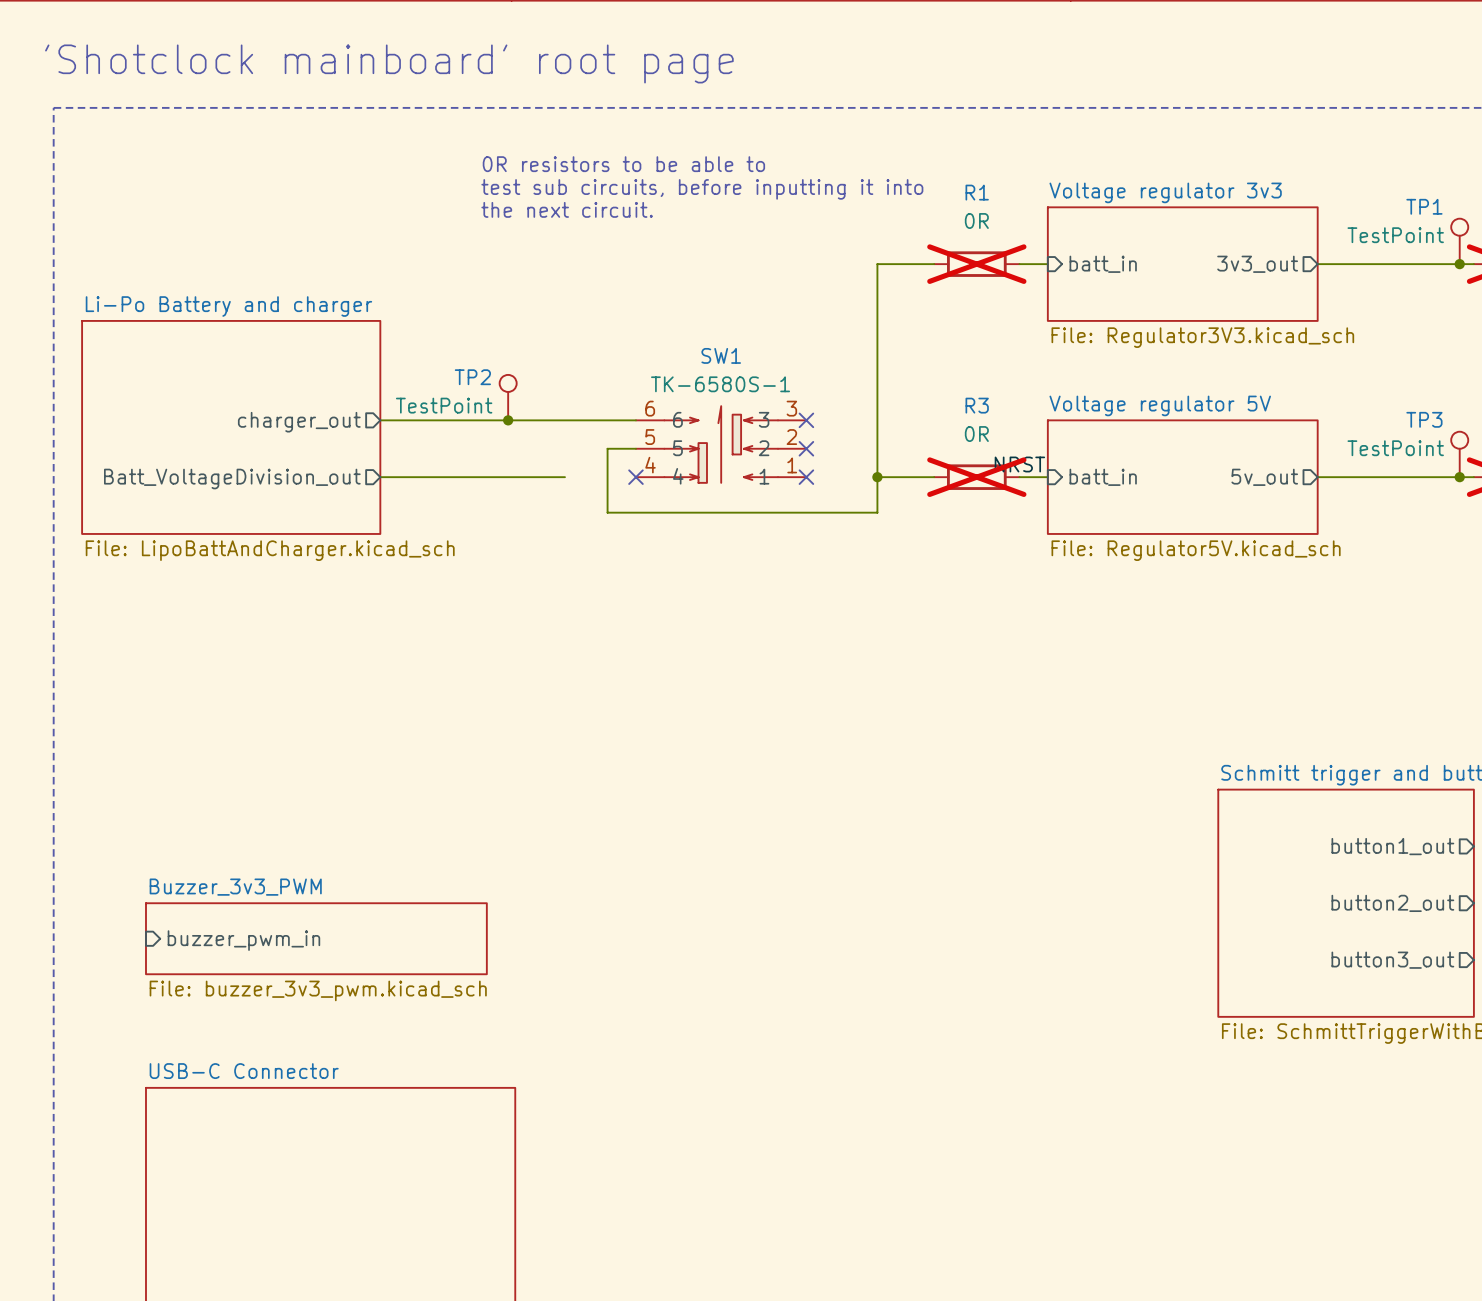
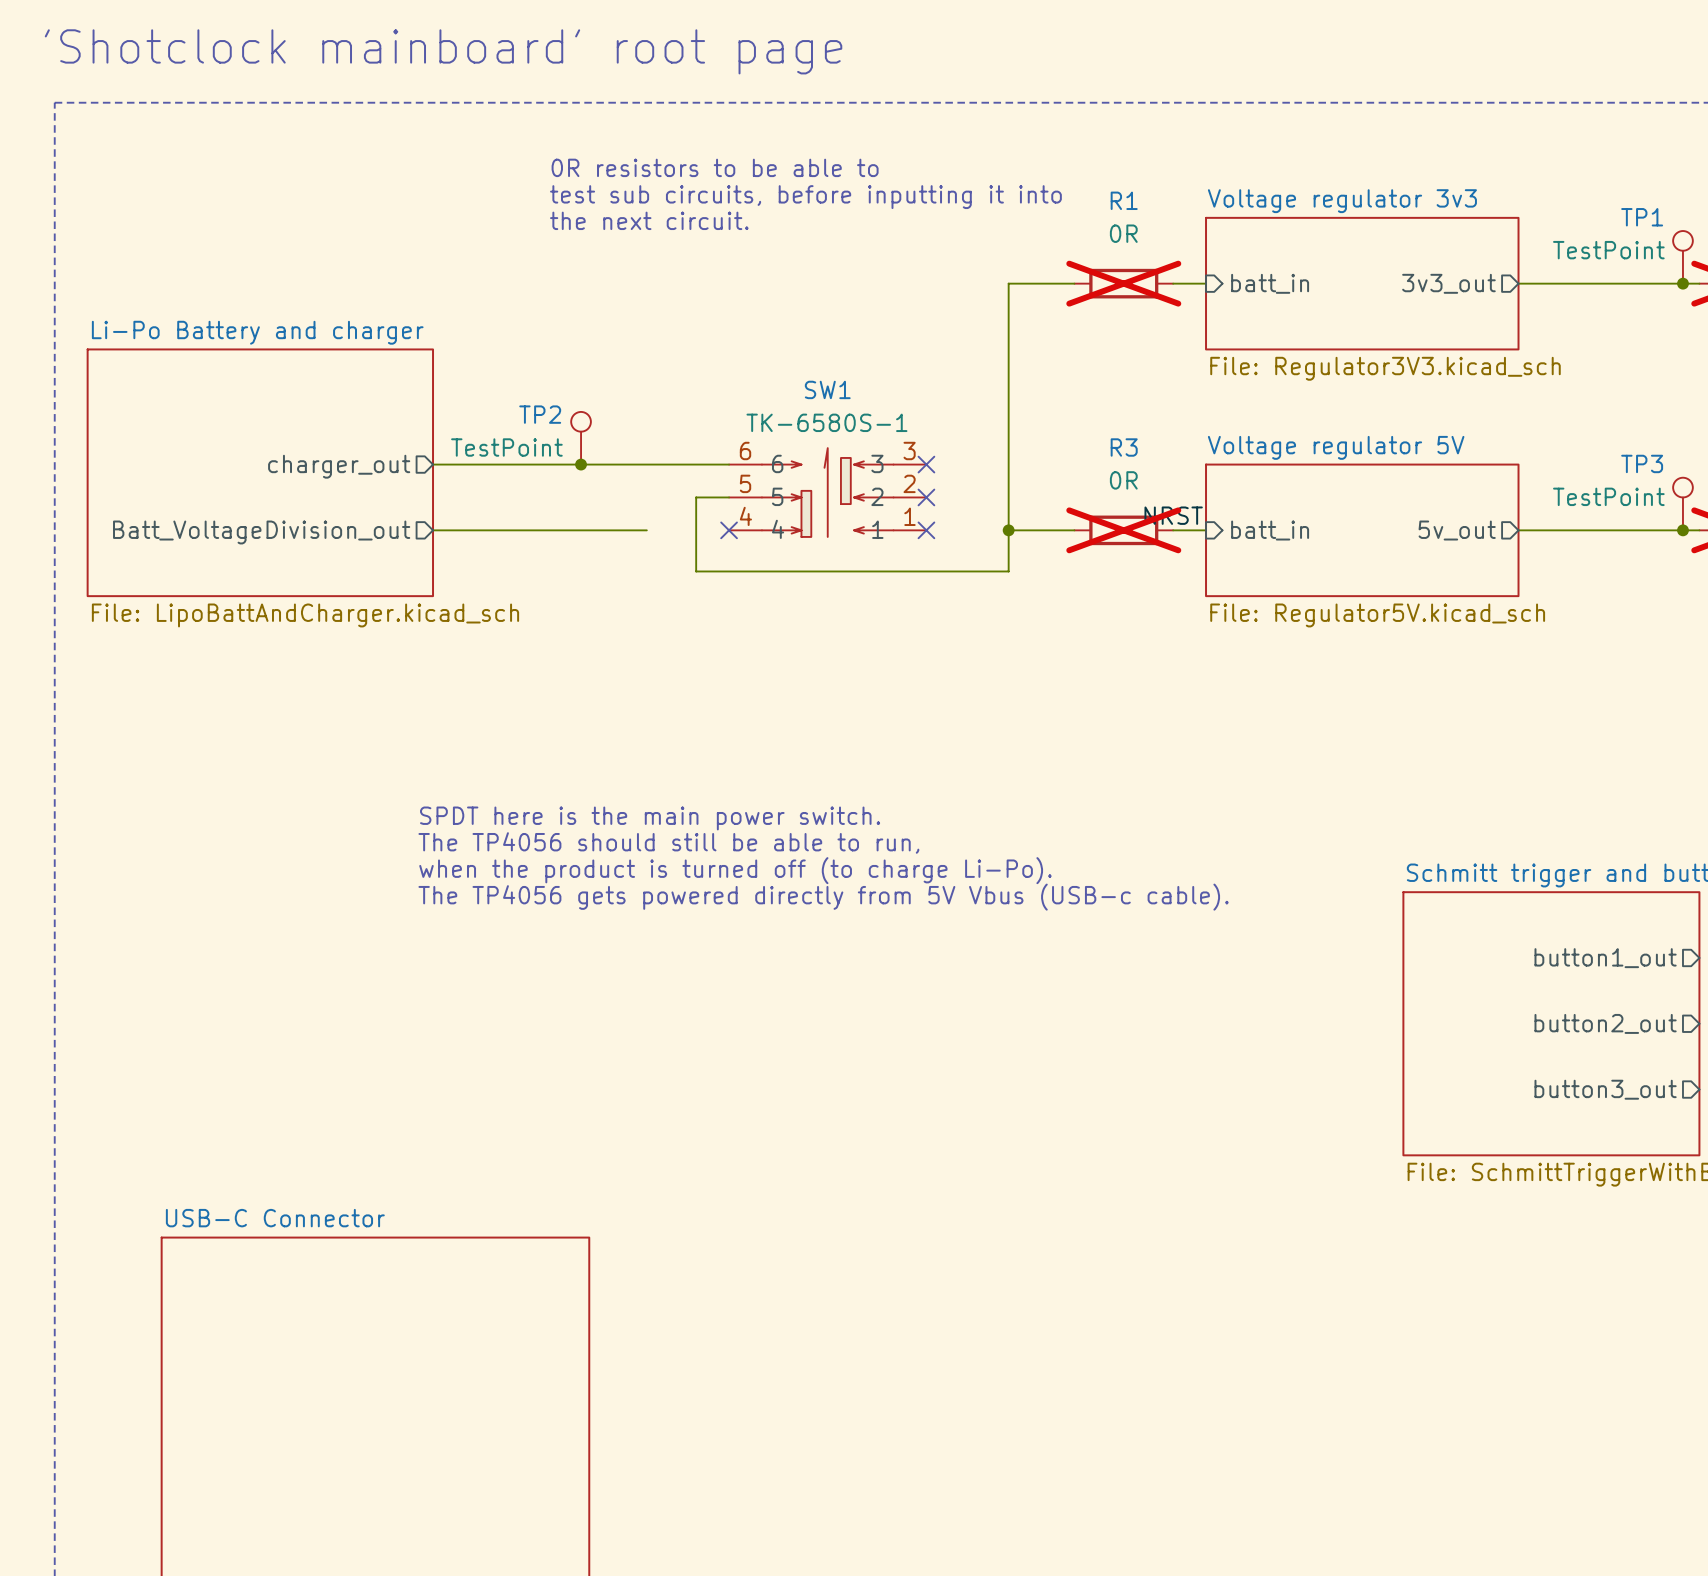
text: none -> SPDT here is the main power switch. (650, 818)
text: none -> The TP4056 should still be able to run, (668, 842)
text: none -> when the product is turned off (to charge Li-Po). (735, 870)
text: none -> The TP4056 gets powered directly from 5V Vbus (USB-c cable). (823, 897)
sheet Buzzer_3v3_PWM: File: buzzer_3v3_pwm.kicad_sch (316, 938) -> none
sheet pin: buzzer_pwm_in (243, 940) -> none

